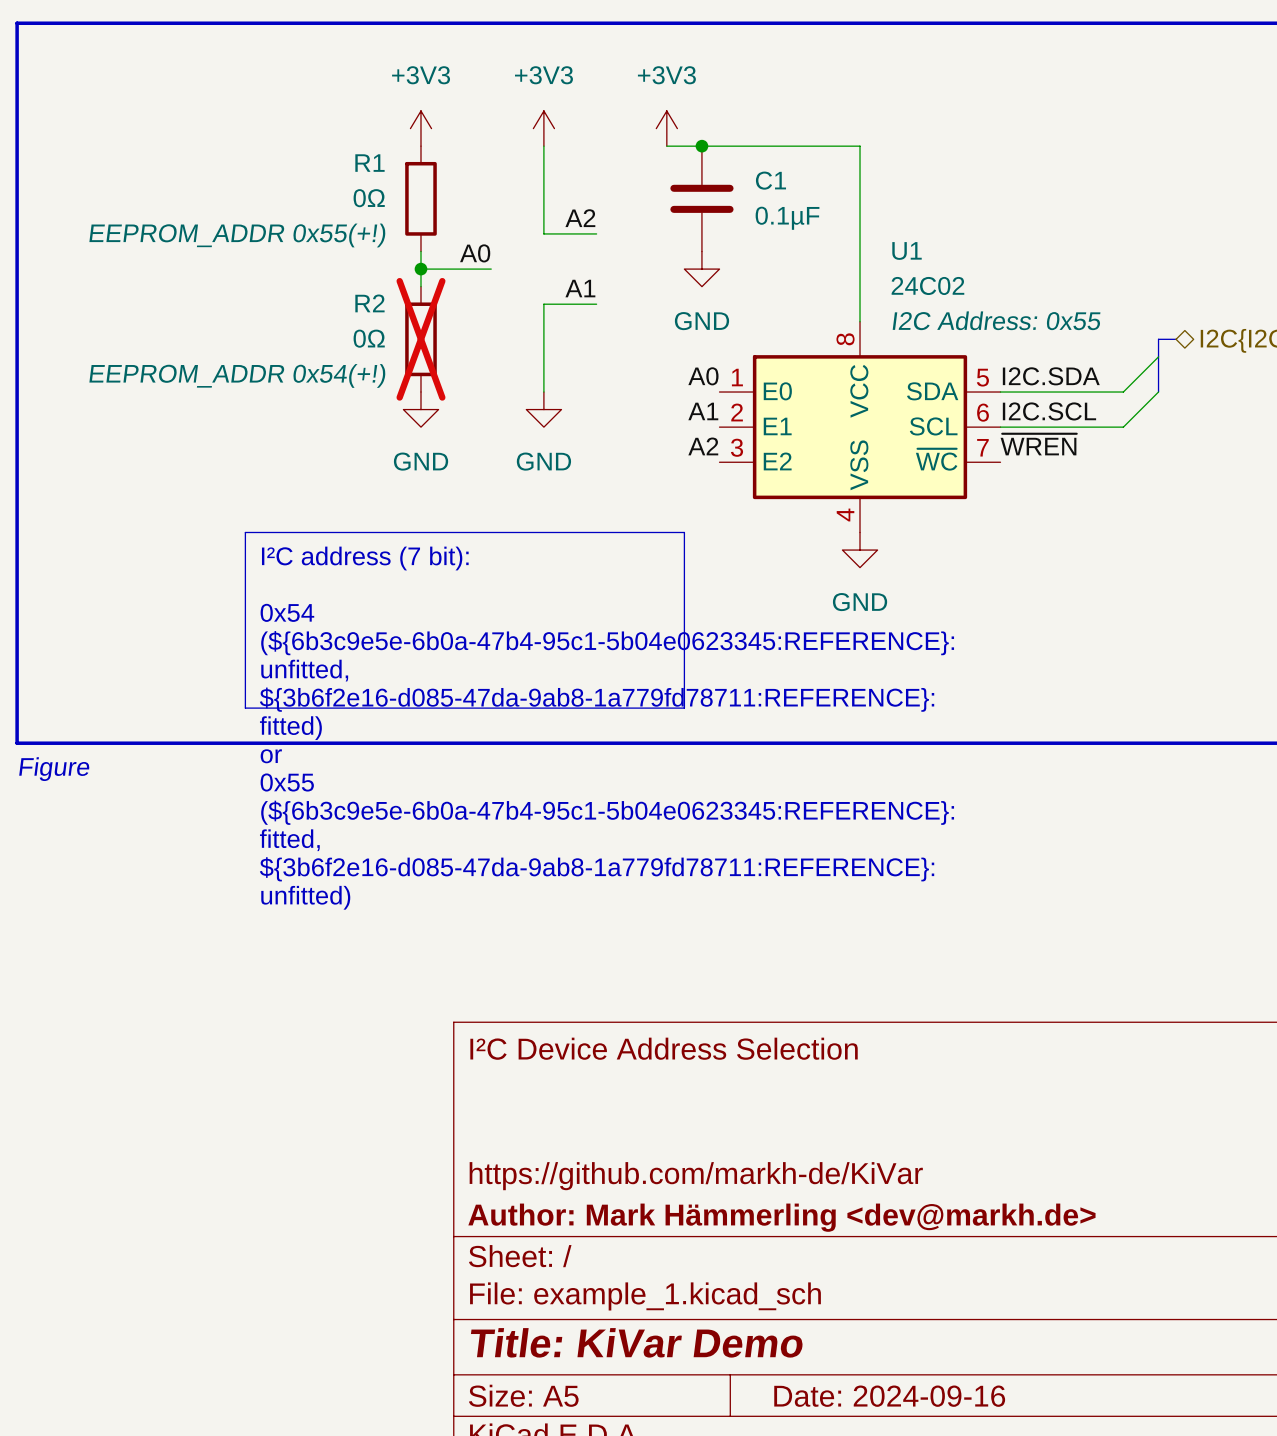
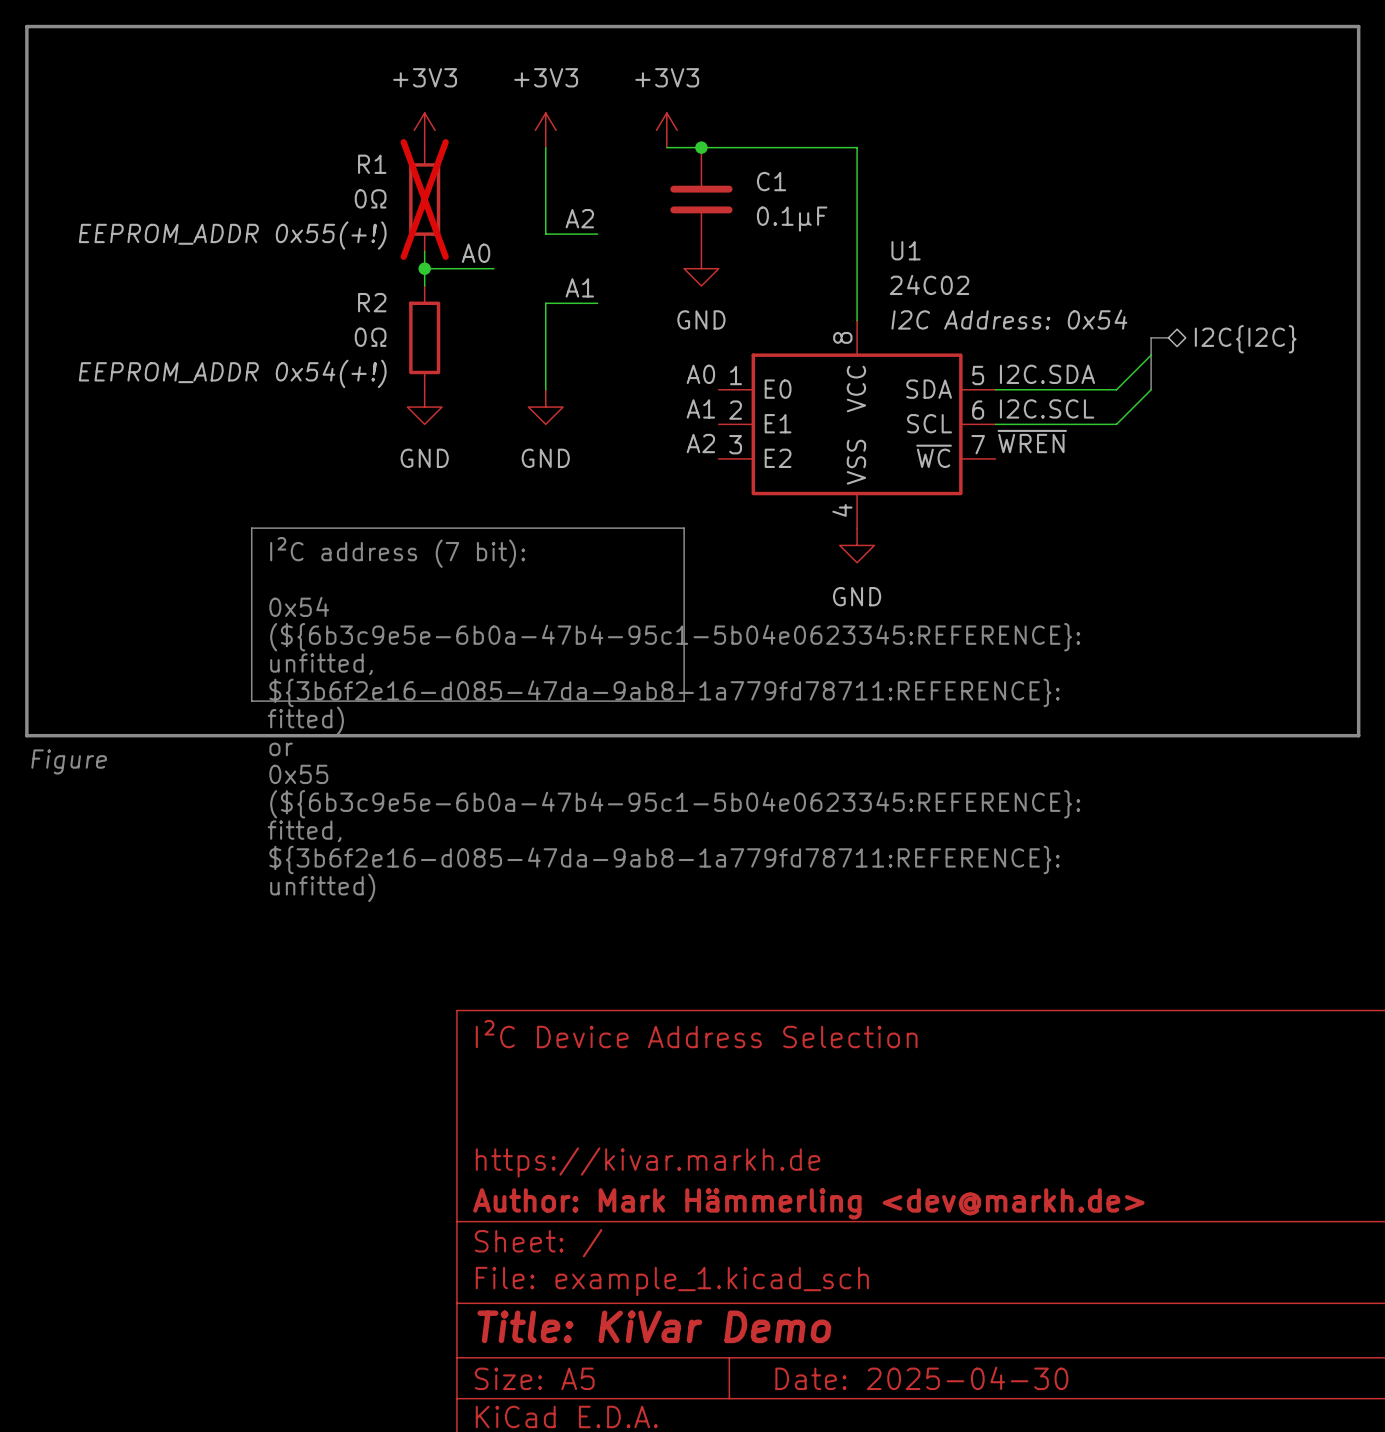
R1 do-not-place cross: none -> (424, 199)
U1 text: I2C Address: 0x55 (996, 320) -> I2C Address: 0x54 (1009, 319)
R2 do-not-place cross: (420, 339) -> none
title block: https://github.com/markh-de/KiVar (696, 1176) -> https://kivar.markh.de (648, 1162)
title block: Date: 2024-09-16 (889, 1396) -> Date: 2025-04-30 (921, 1378)

